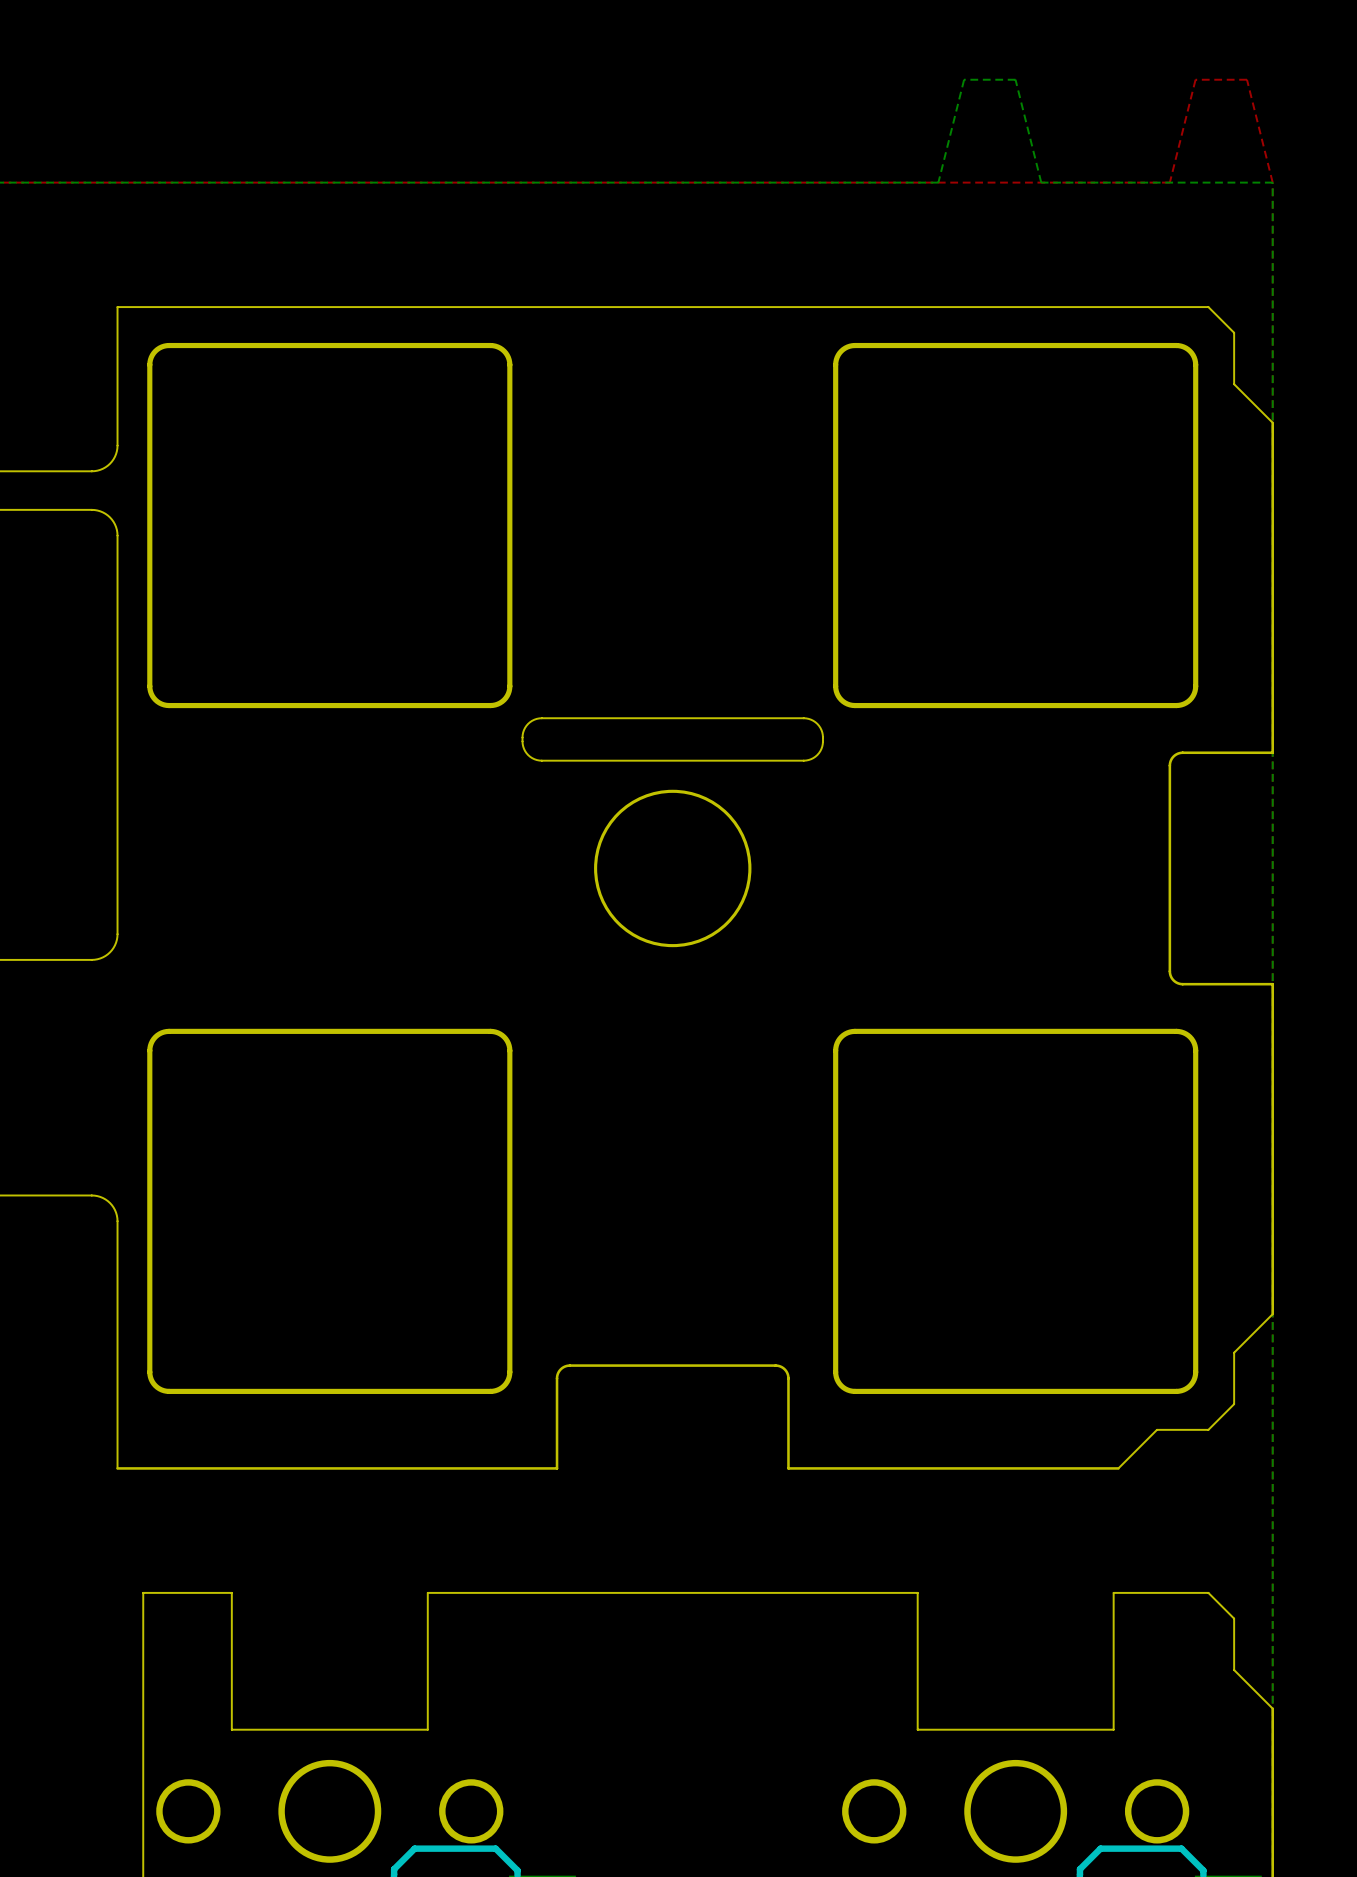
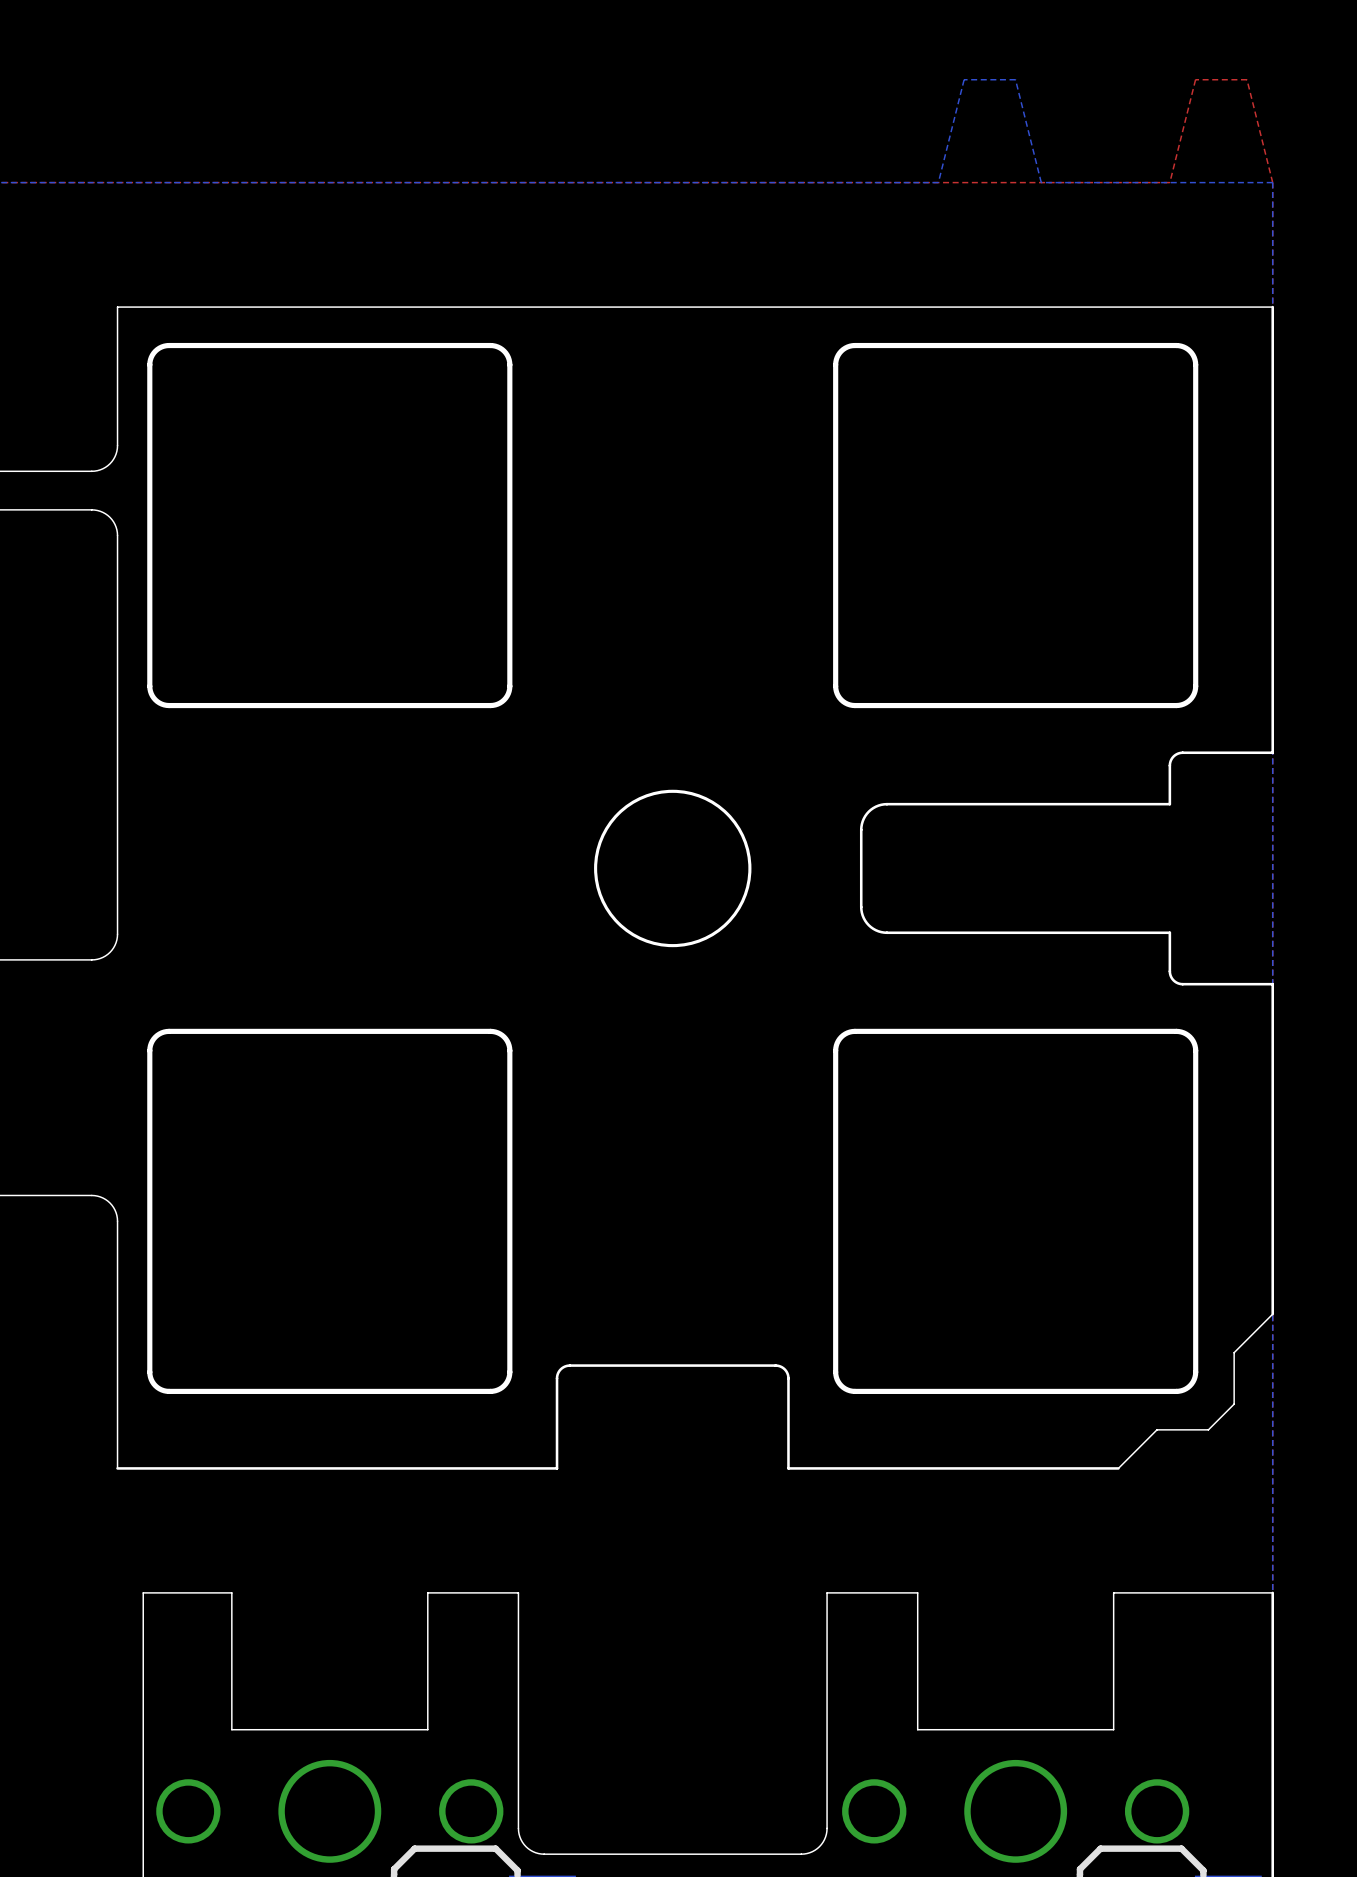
board edge: (1208, 307) (1234, 332) (1234, 384) (1272, 422) -> (1208, 307) (1272, 307) (1272, 422)
board edge: (803, 718) (539, 718) (532, 720) (525, 727) (522, 743) (530, 756) (541, 760) (806, 760) (819, 753) (822, 746) (822, 737) (817, 723) (803, 718) -> none
board edge: (1169, 804) (1169, 932) -> (1169, 804) (884, 804) (875, 806) (866, 813) (861, 829) (861, 909) (866, 923) (878, 931) (1169, 932)
board edge: (827, 1592) (518, 1592) -> (827, 1592) (826, 1831) (819, 1846) (809, 1852) (801, 1854) (544, 1854) (533, 1851) (525, 1846) (520, 1839) (518, 1828) (518, 1592)
board edge: (1208, 1592) (1234, 1618) (1234, 1670) (1272, 1708) -> (1208, 1592) (1272, 1592) (1272, 1708)

